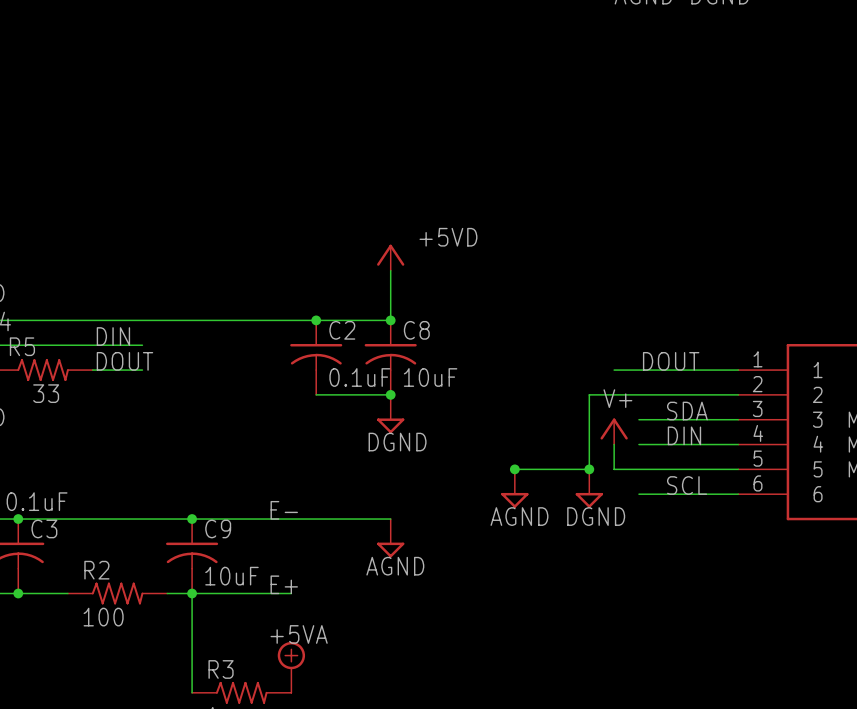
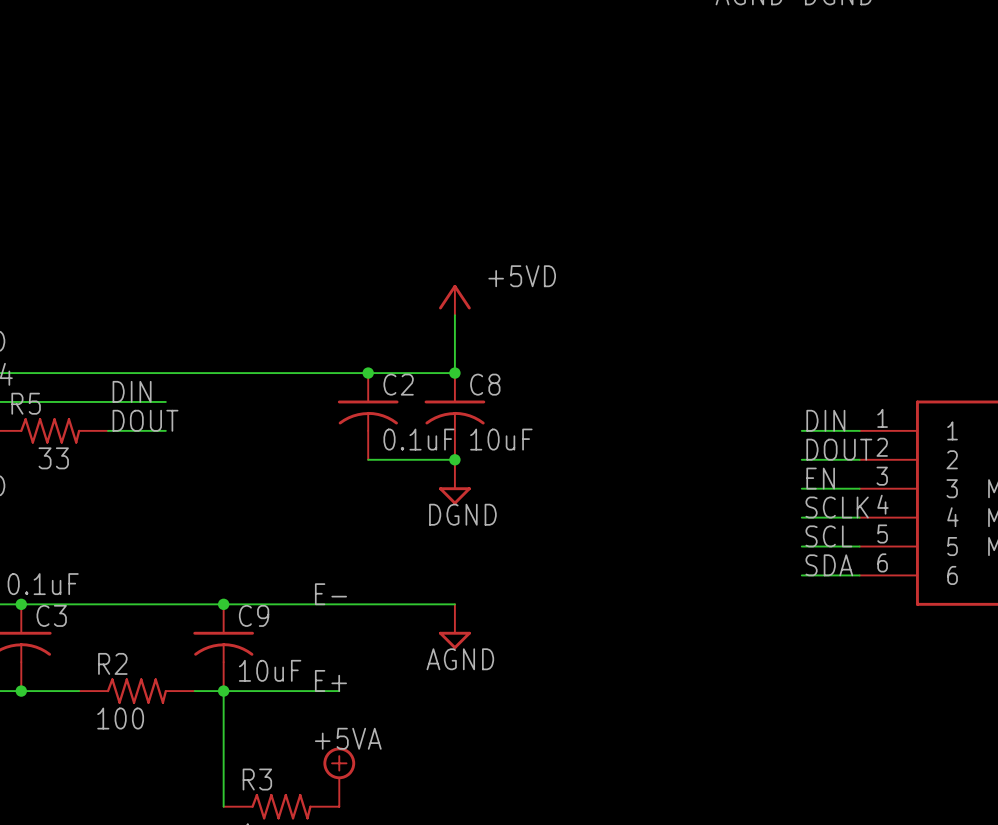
label position: DOUT (671, 361) -> DOUT (839, 449)
wire: (614, 370) (688, 370) -> none
wire: (688, 394) (589, 394) (589, 469) (514, 469) -> none
label position: SDA (687, 411) -> SDA (829, 565)
label: none -> EN (820, 478)
wire: (638, 419) (688, 419) -> none
power symbol: V+ (614, 431) -> none
label position: DIN (684, 435) -> DIN (825, 420)
label: none -> SCLK (837, 507)
wire: (614, 444) (614, 469) (688, 469) -> none
wire: (638, 444) (688, 444) -> none
junction: (514, 469) -> none
junction: (589, 469) -> none
label position: SCL (687, 485) -> SCL (828, 536)
power symbol: AGND (514, 488) -> none
power symbol: DGND (589, 488) -> none
wire: (638, 494) (688, 494) -> none

